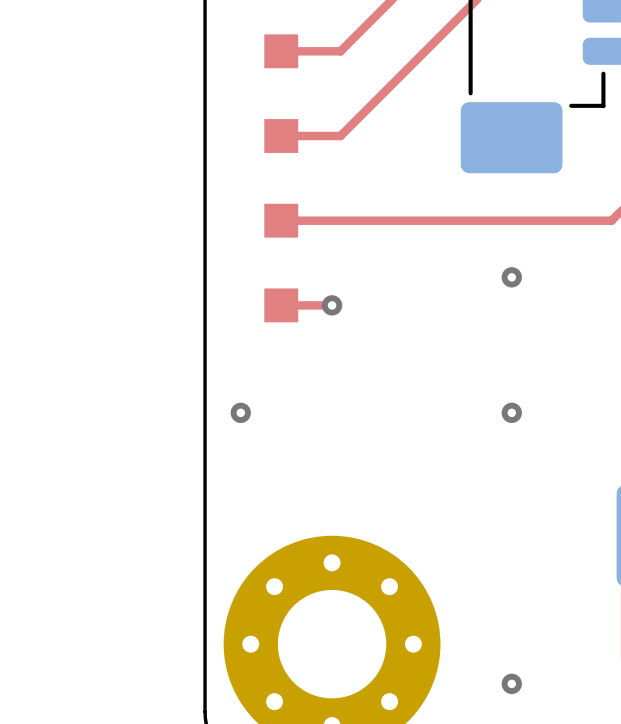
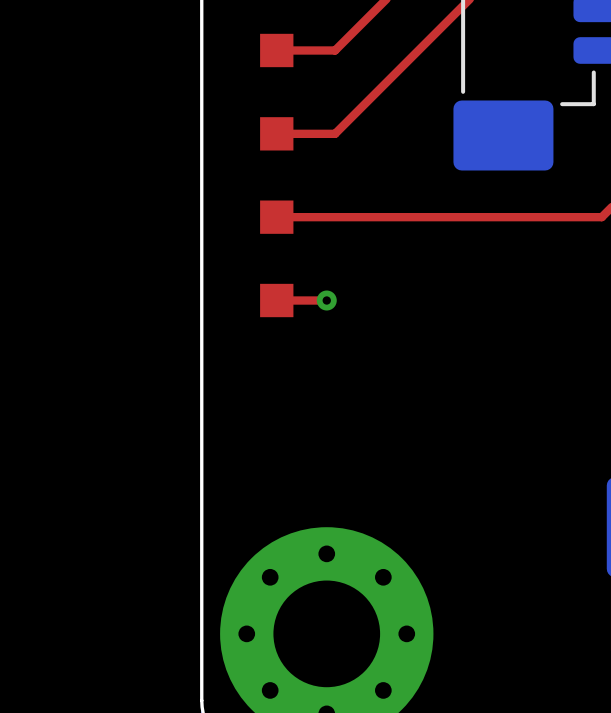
via: (511, 277) -> none
via: (240, 412) -> none
via: (511, 412) -> none
via: (511, 683) -> none

